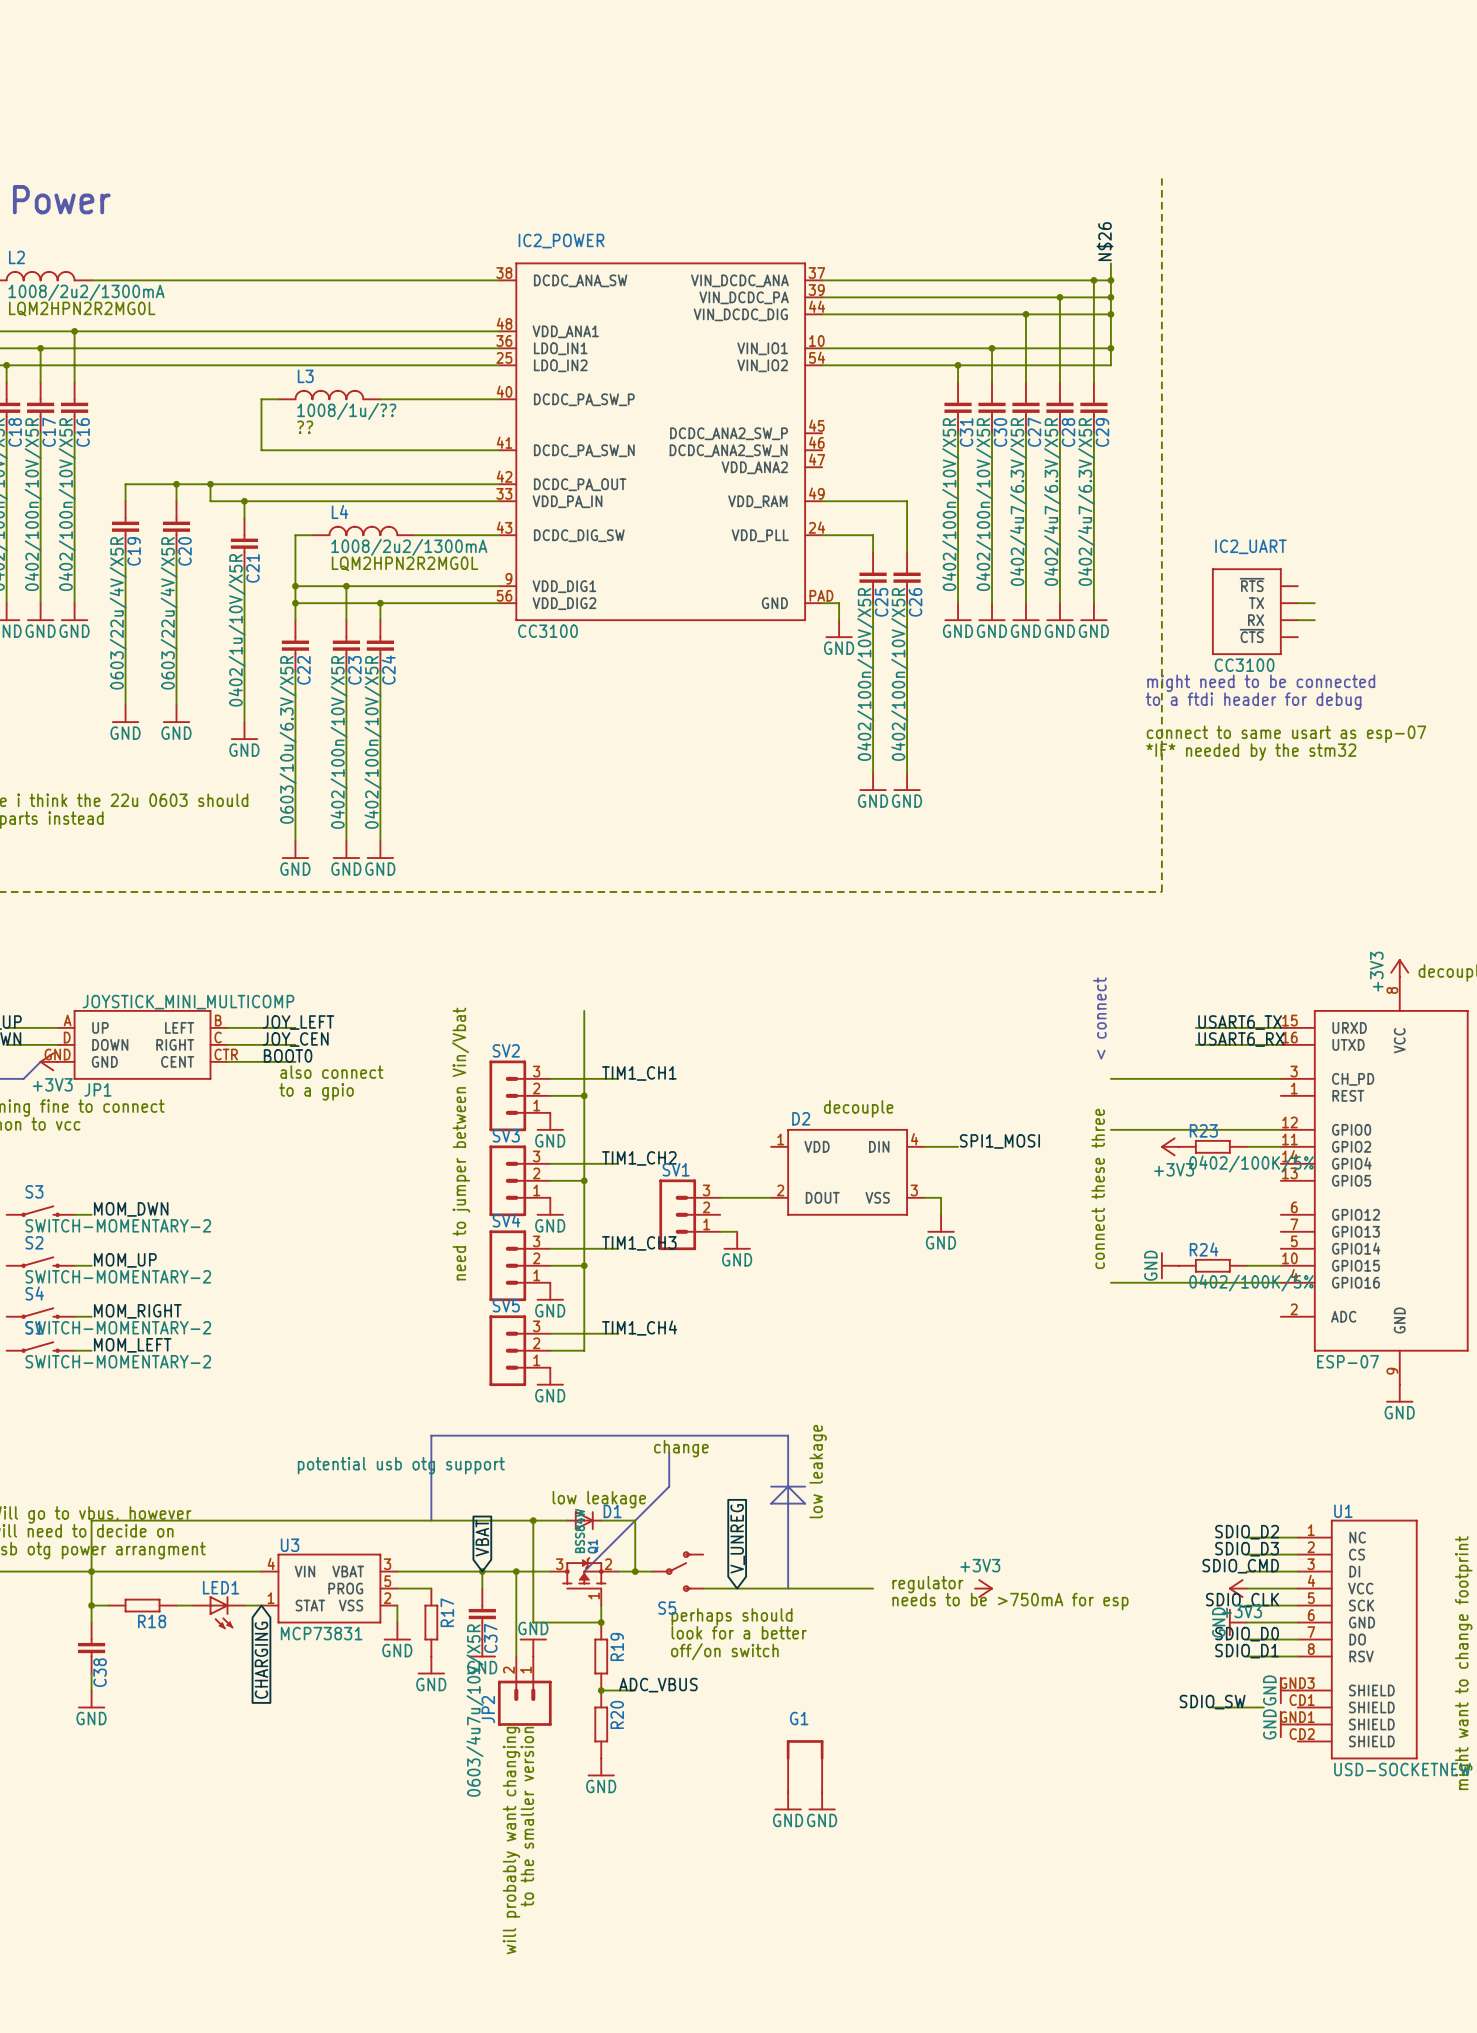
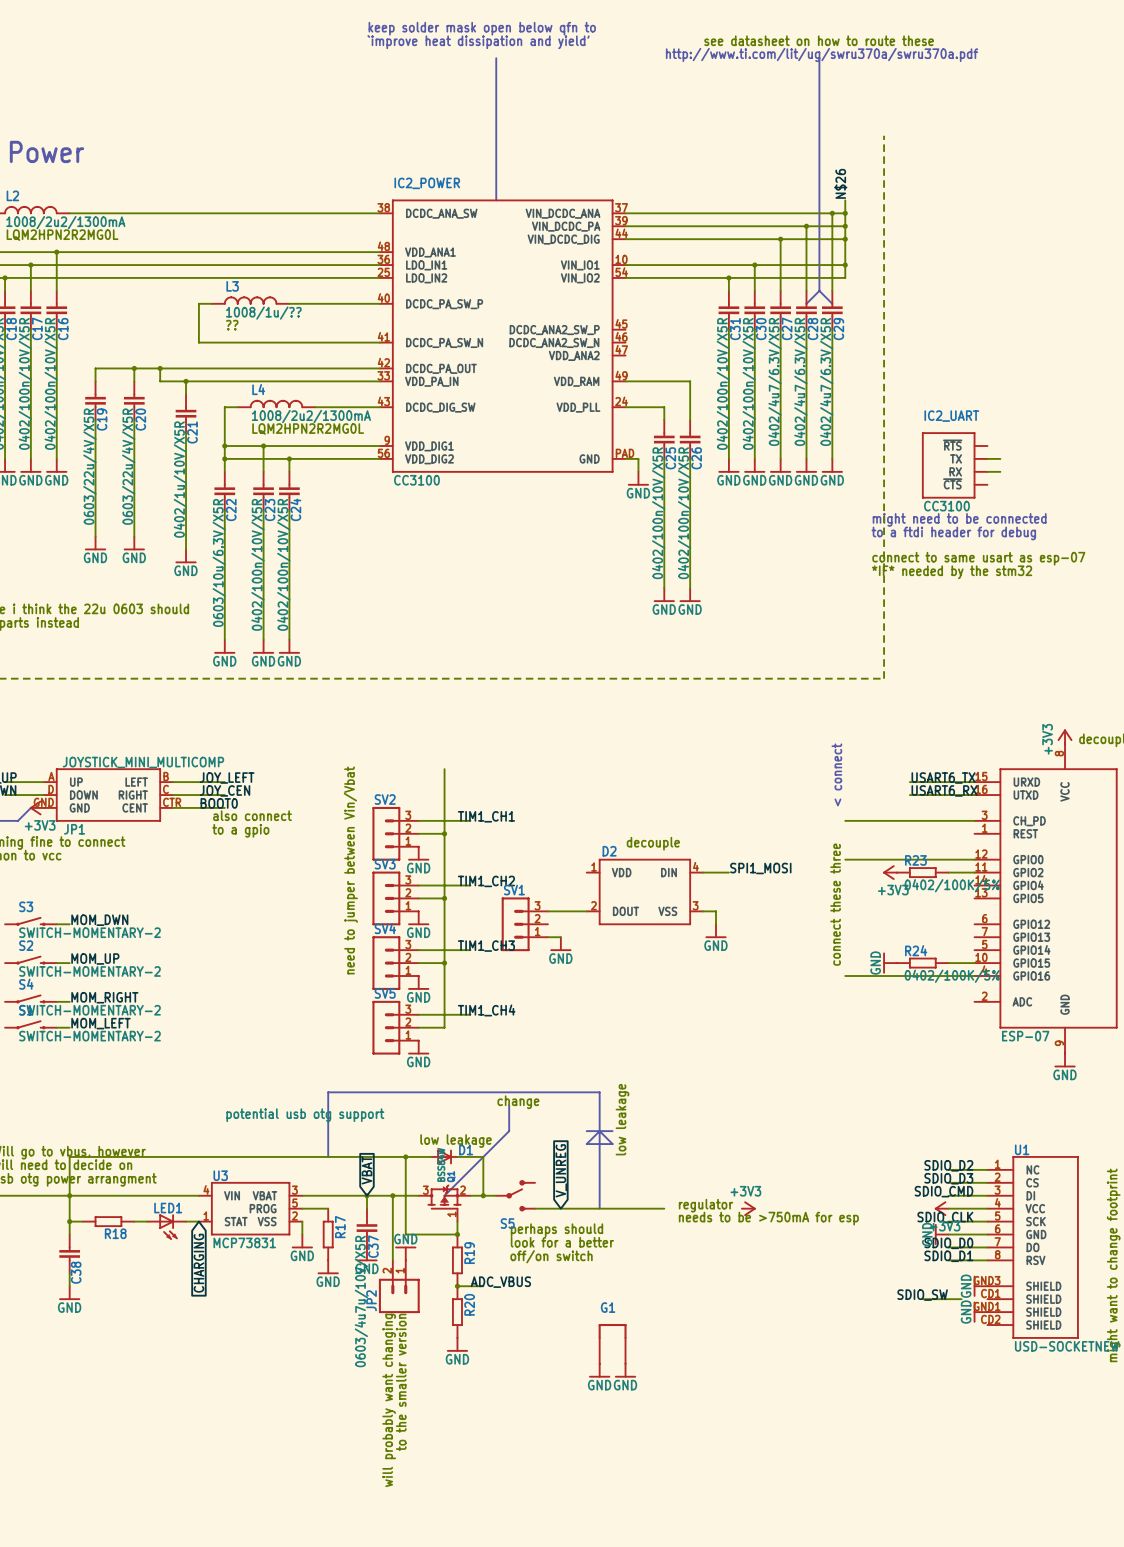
text: none -> keep solder mask open below qfn to (482, 28)
text: none -> see datasheet on how to route these (819, 40)
text: none -> `improve heat dissipation and yield' (478, 42)
text: none -> http://www.ti.com/lit/ug/swru370a/swru370a.pdf (822, 54)
line: none -> (496, 58) (496, 200)
line: none -> (819, 58) (819, 290)
line: none -> (819, 290) (806, 303)
line: none -> (819, 290) (832, 303)

